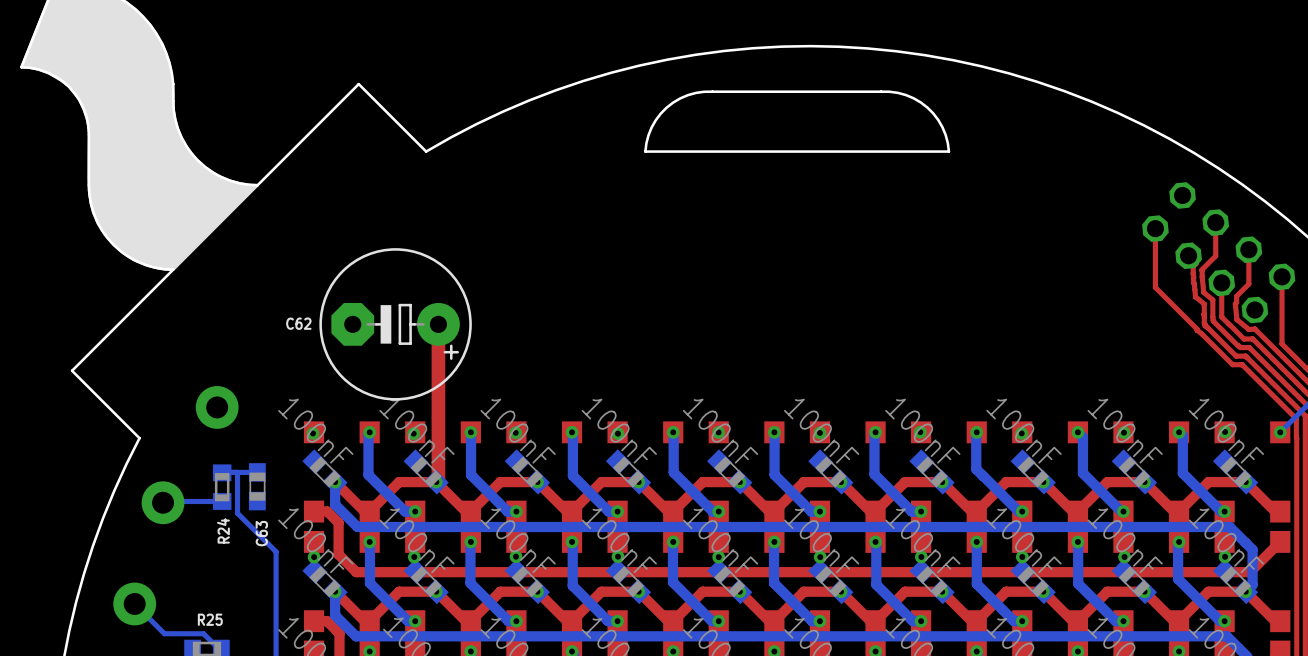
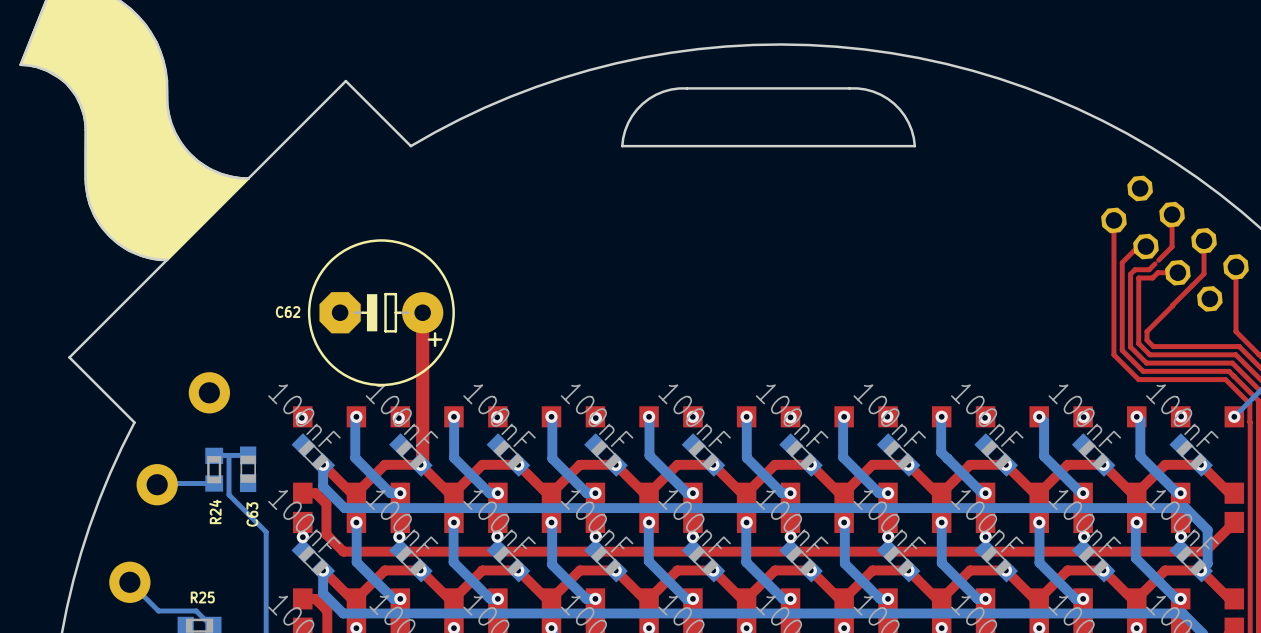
top track: (1188, 255) (1196, 263) (1193, 266) (1195, 296) (1204, 304) (1205, 325) (1236, 356) (1245, 356) (1274, 385) -> (1145, 246) (1138, 246) (1122, 262) (1122, 350) (1143, 371) (1229, 371)
top track: (1201, 269) (1203, 292) (1212, 299) (1213, 321) (1237, 345) (1249, 347) (1278, 376) -> (1155, 263) (1149, 269) (1134, 269) (1130, 274) (1130, 347) (1146, 363) (1232, 363)
top track: (1221, 282) (1221, 316) -> none
top track: (1155, 287) (1232, 364) (1242, 364) (1271, 393) -> (1113, 277) (1113, 354) (1138, 379) (1225, 379)
top track: (1236, 296) (1236, 319) (1248, 329) (1254, 328) (1285, 359) -> (1192, 285) (1147, 331) (1147, 340) (1153, 346) (1239, 346)
top track: (1221, 317) (1244, 339) (1252, 338) (1281, 368) -> (1177, 272) (1157, 272) (1152, 278) (1138, 278) (1138, 343) (1149, 354) (1235, 354)

